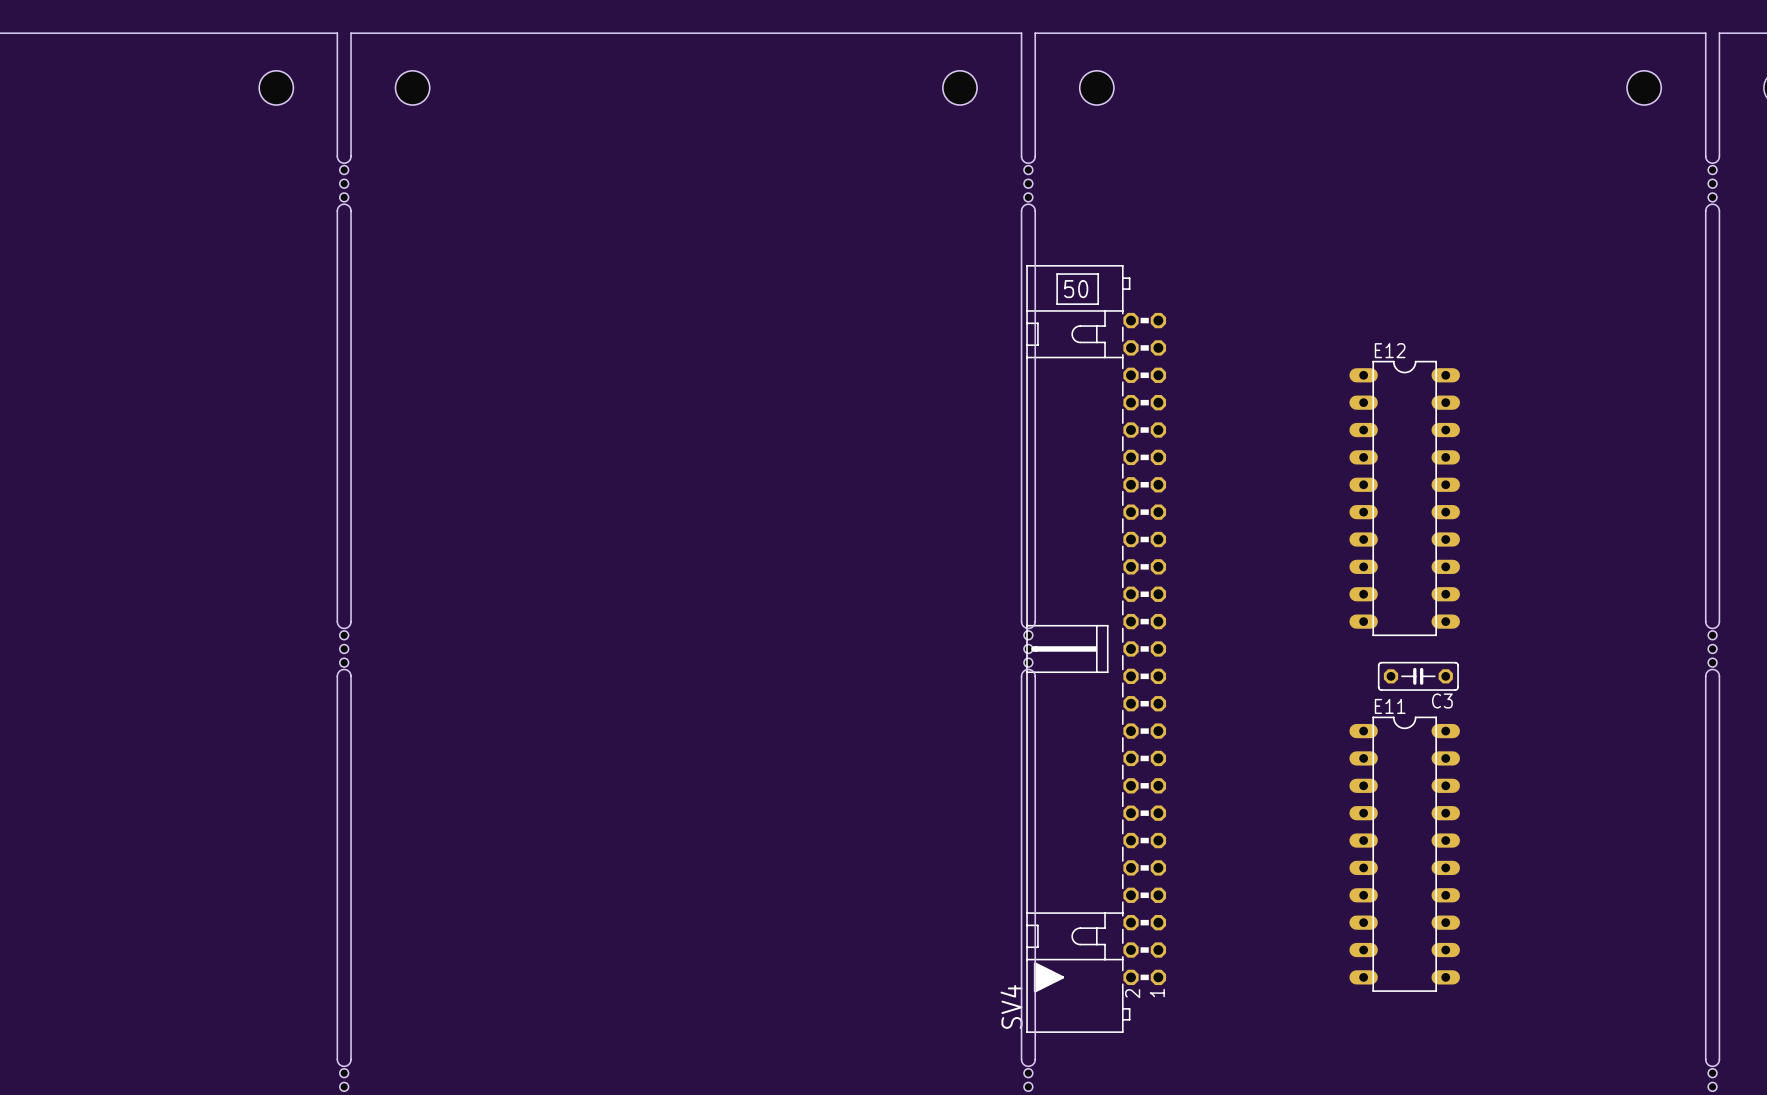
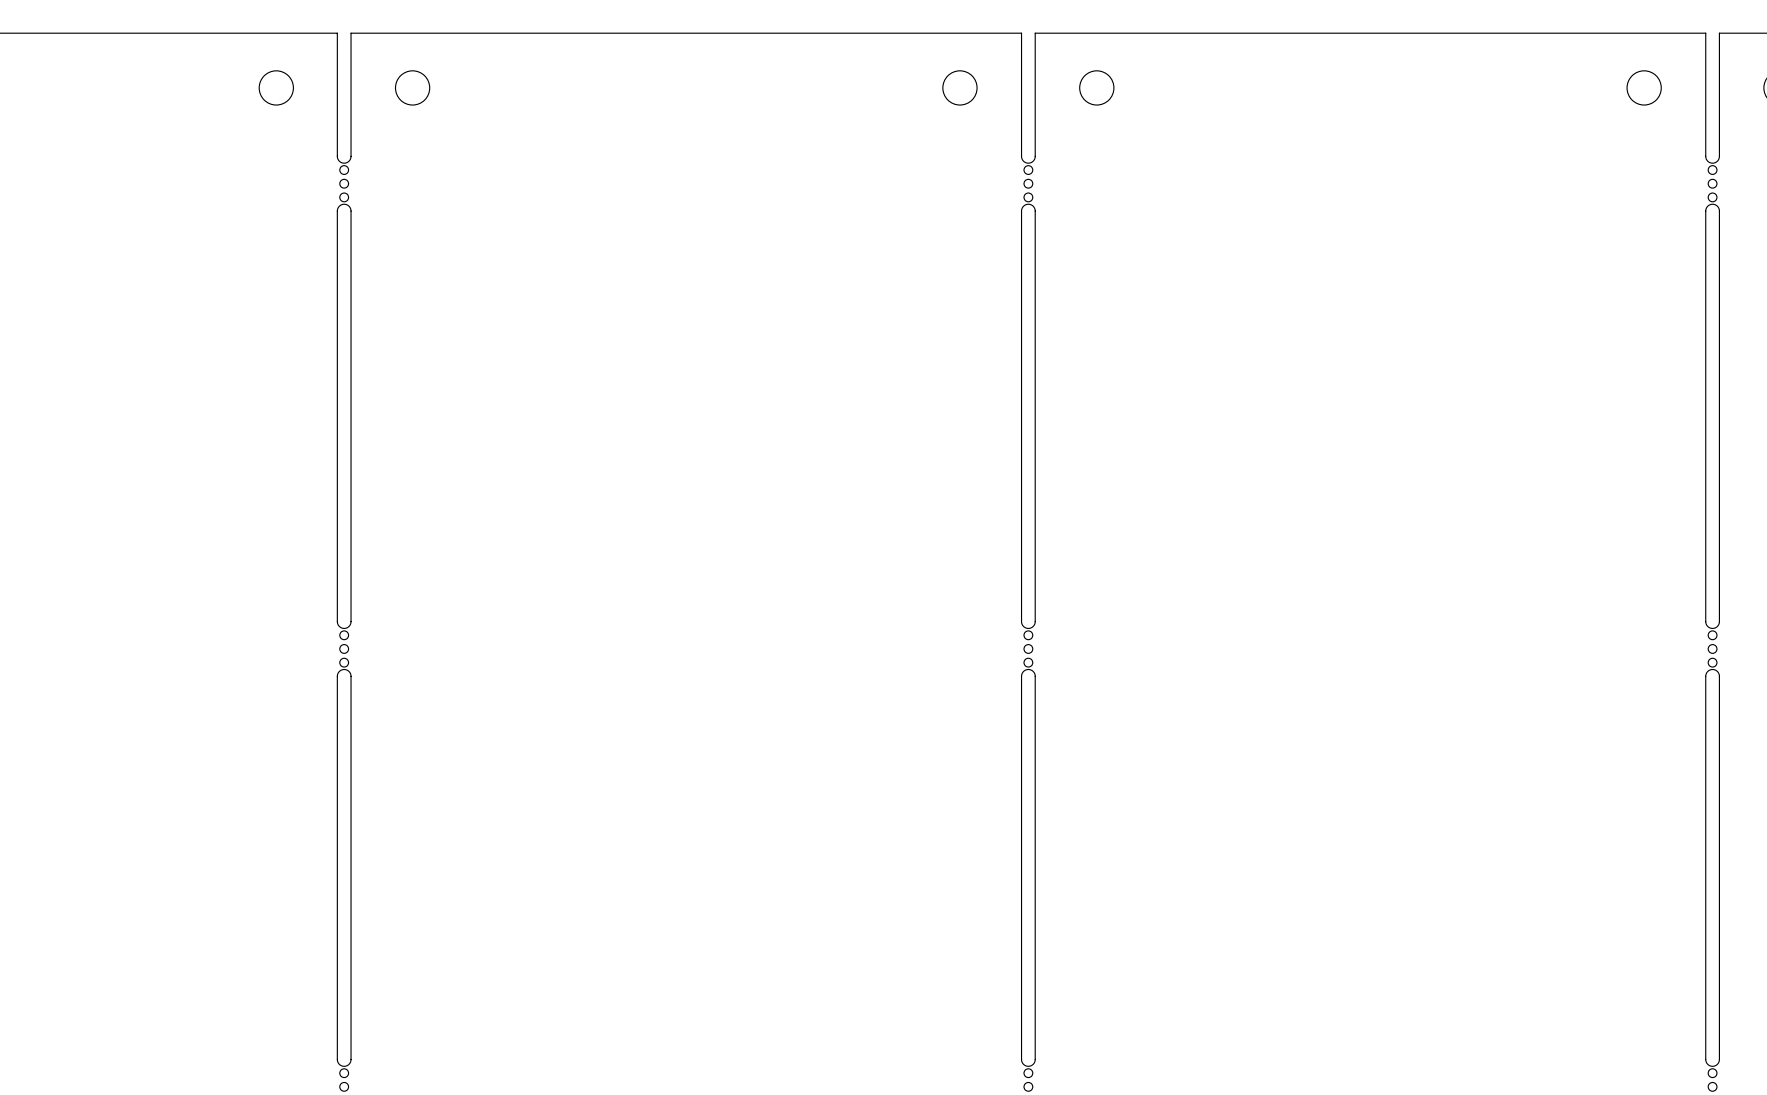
E12: (1404, 498) -> none
SV4: (1096, 648) -> none
C3: (1418, 676) -> none
E11: (1404, 854) -> none

